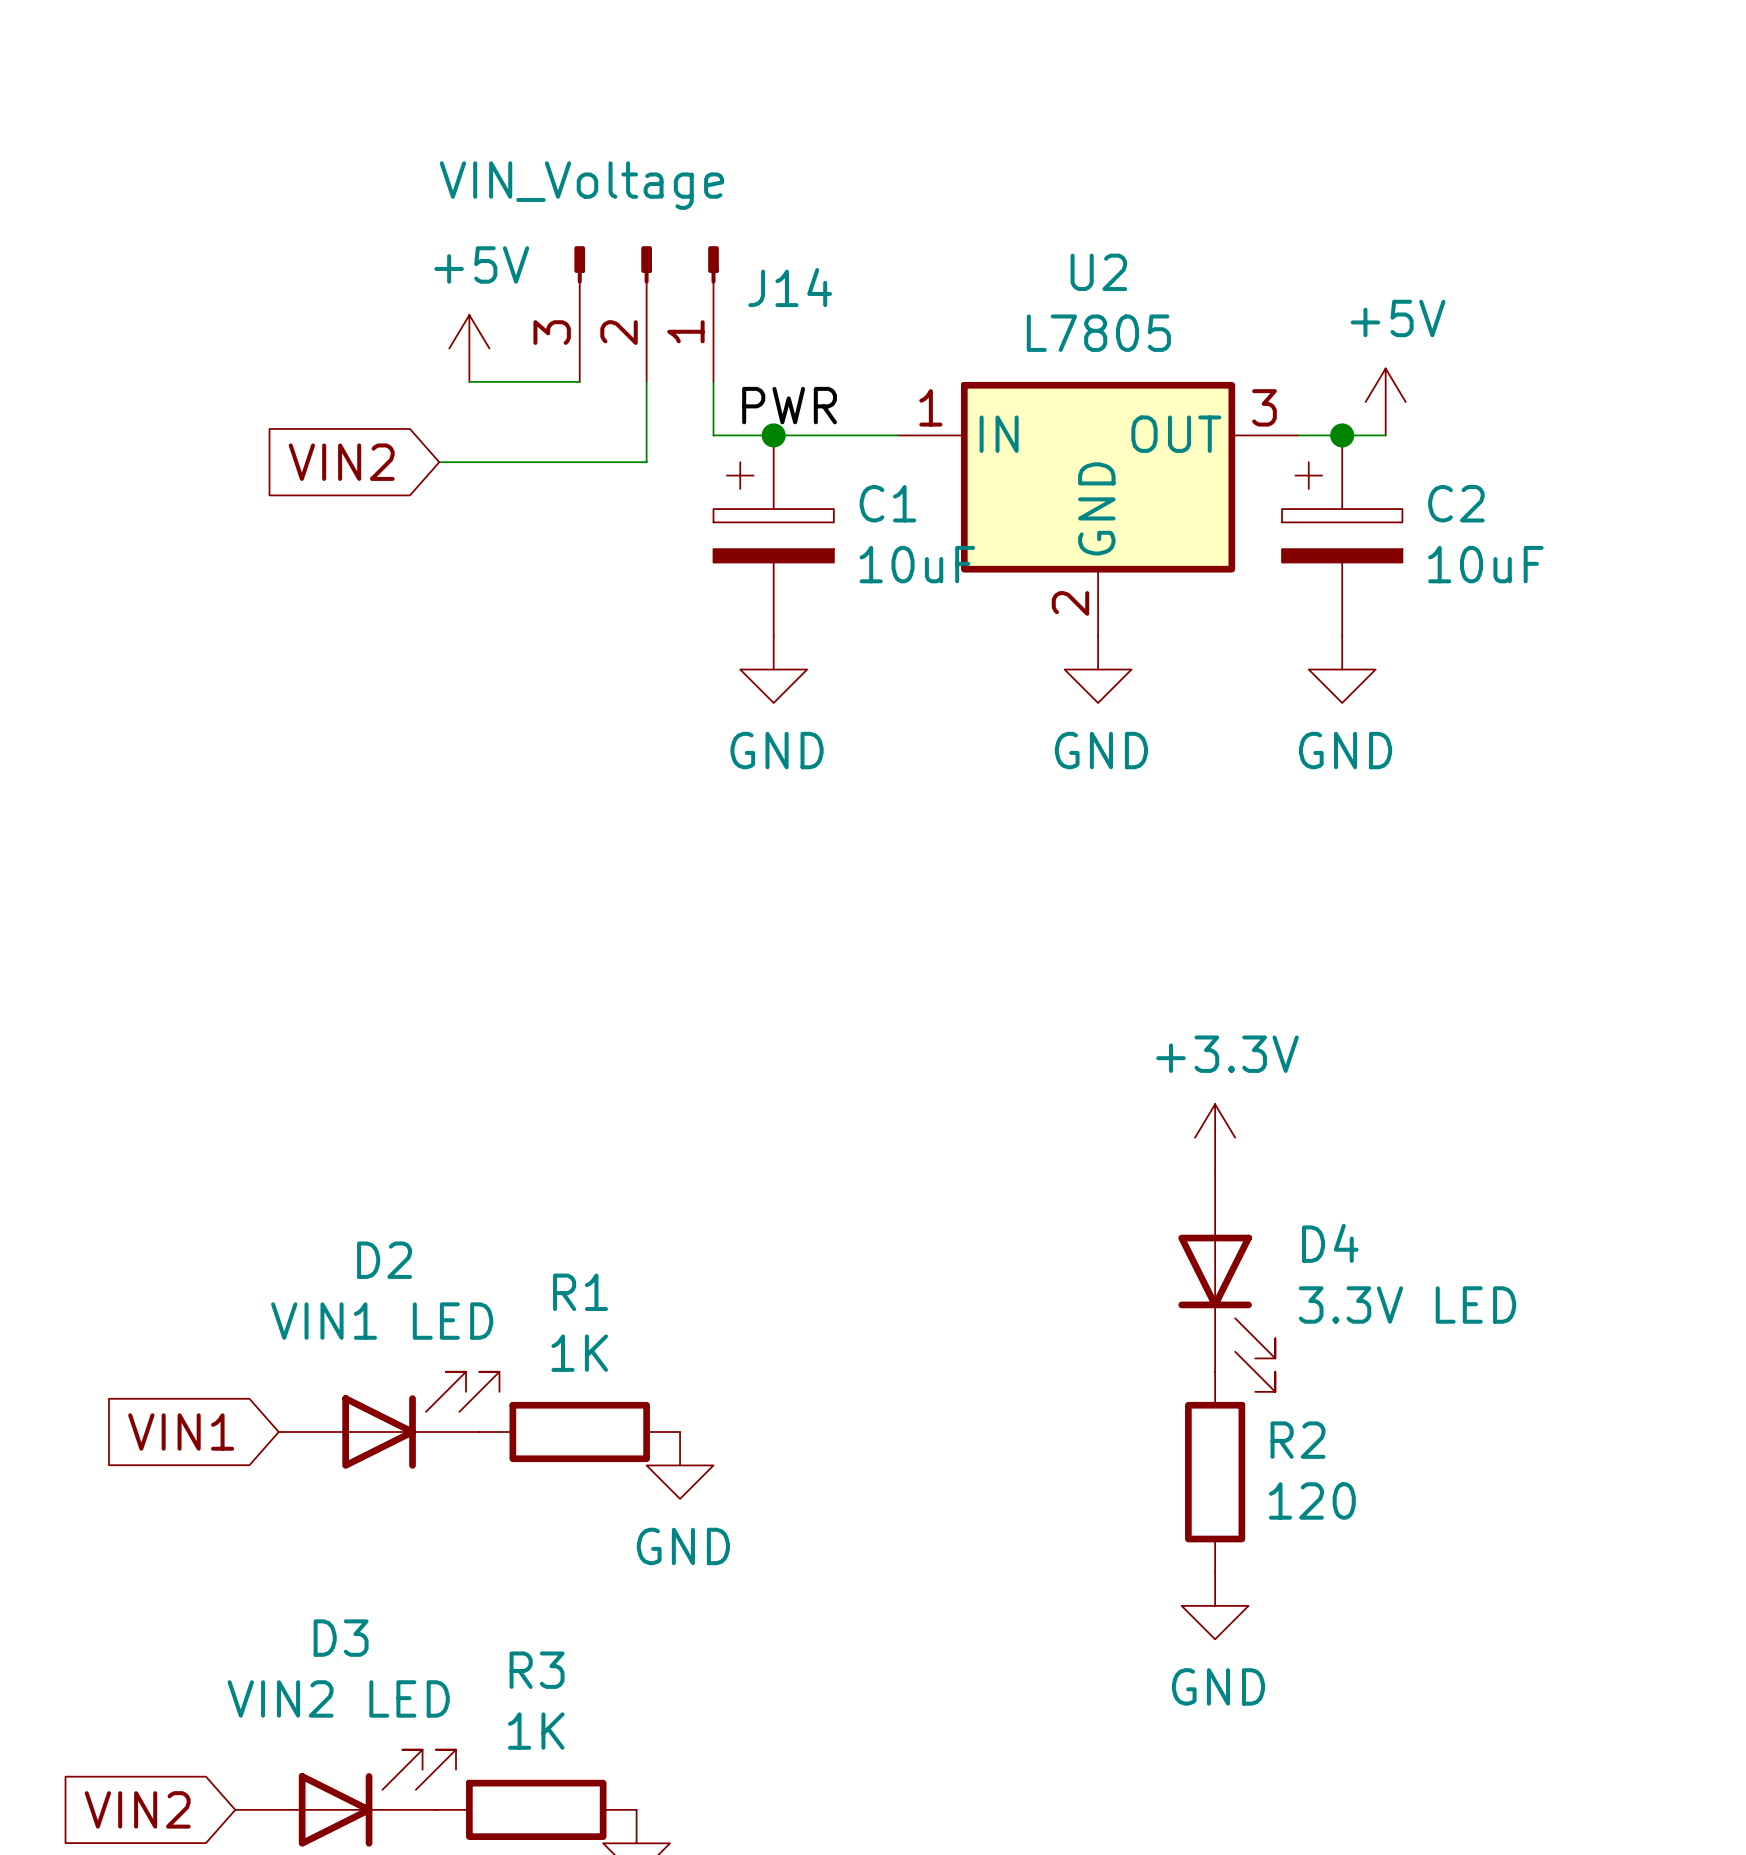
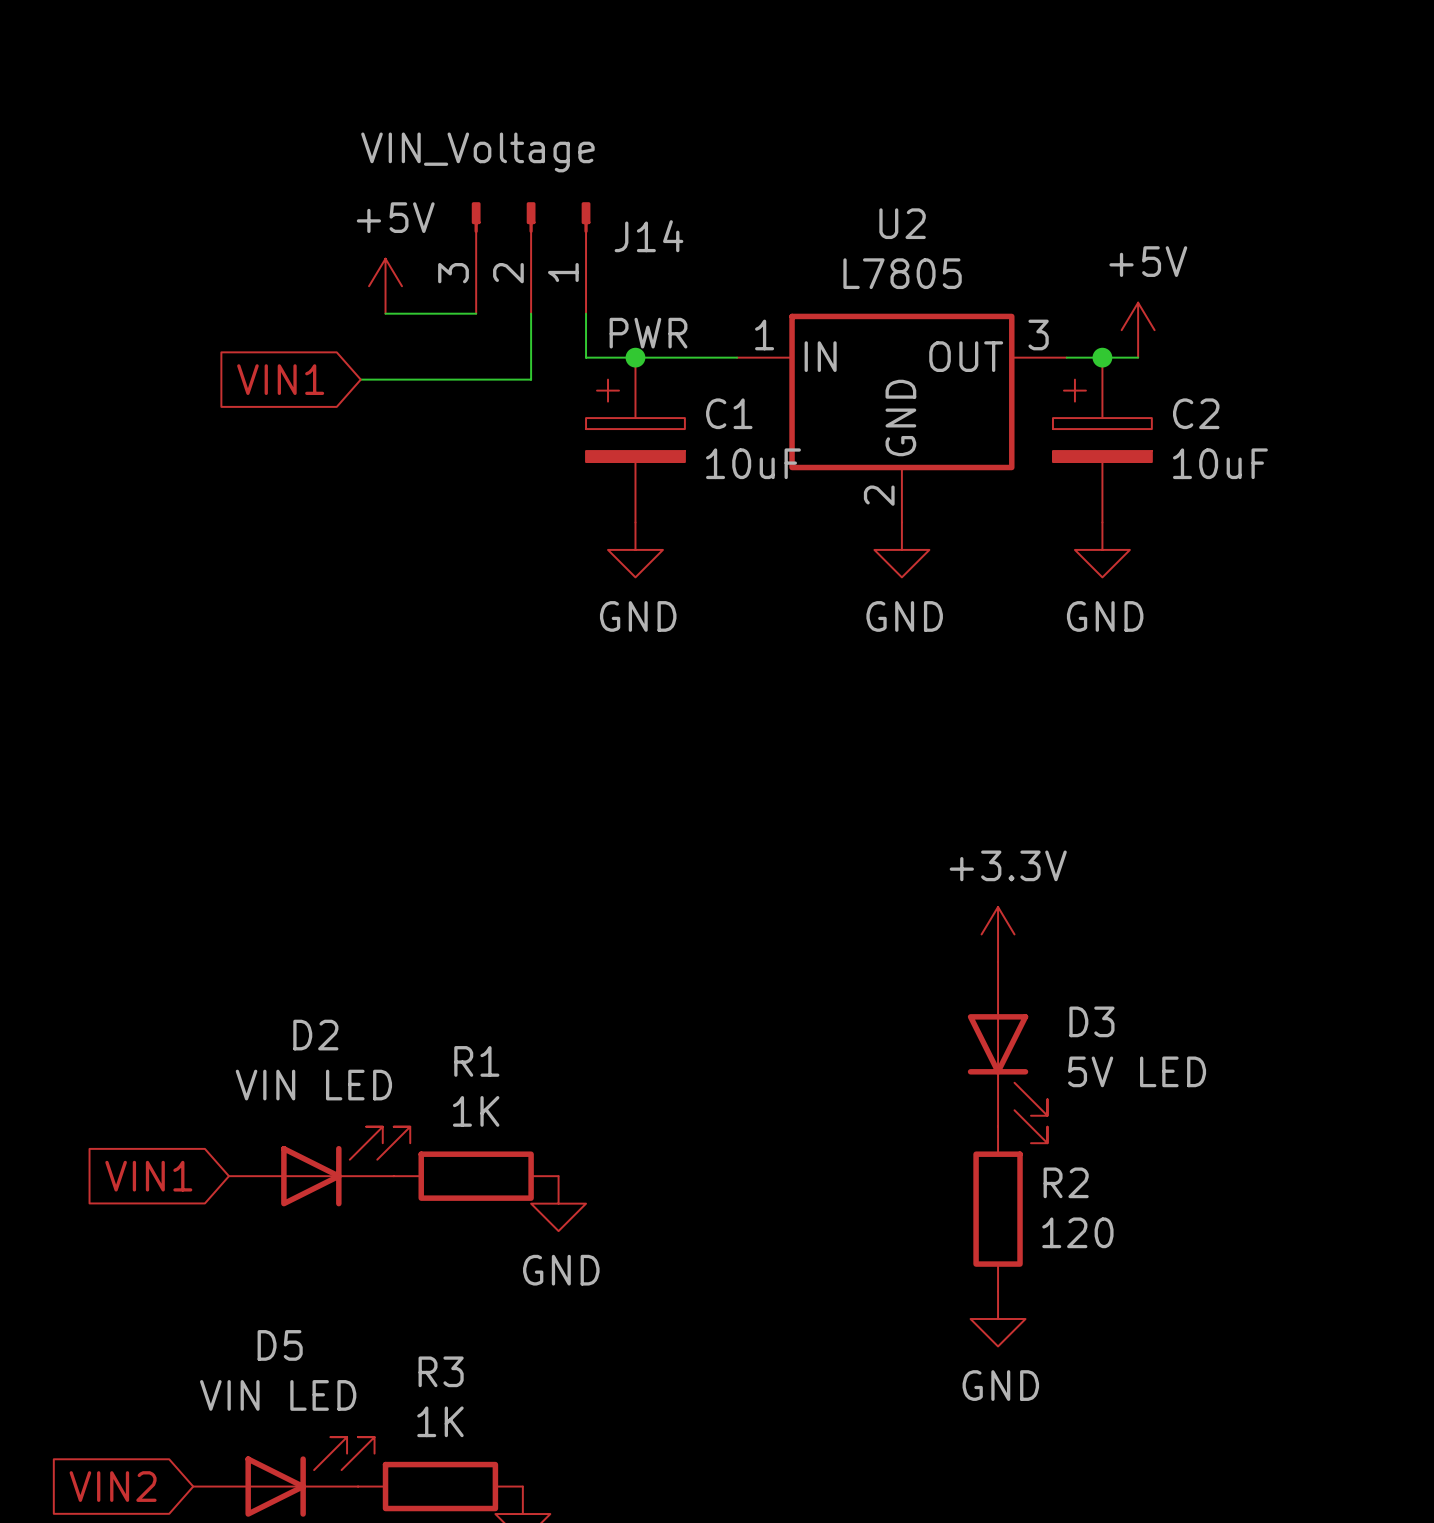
global label: VIN2 (341, 462) -> VIN1 (280, 379)
D4 name: D4 (1330, 1243) -> D3 (1091, 1021)
D4 value: 3.3V LED (1407, 1305) -> 5V LED (1137, 1071)
D2 value: VIN1 LED (382, 1321) -> VIN LED (313, 1085)
D3 name: D3 (341, 1638) -> D5 (280, 1345)
D3 value: VIN2 LED (338, 1698) -> VIN LED (278, 1395)

